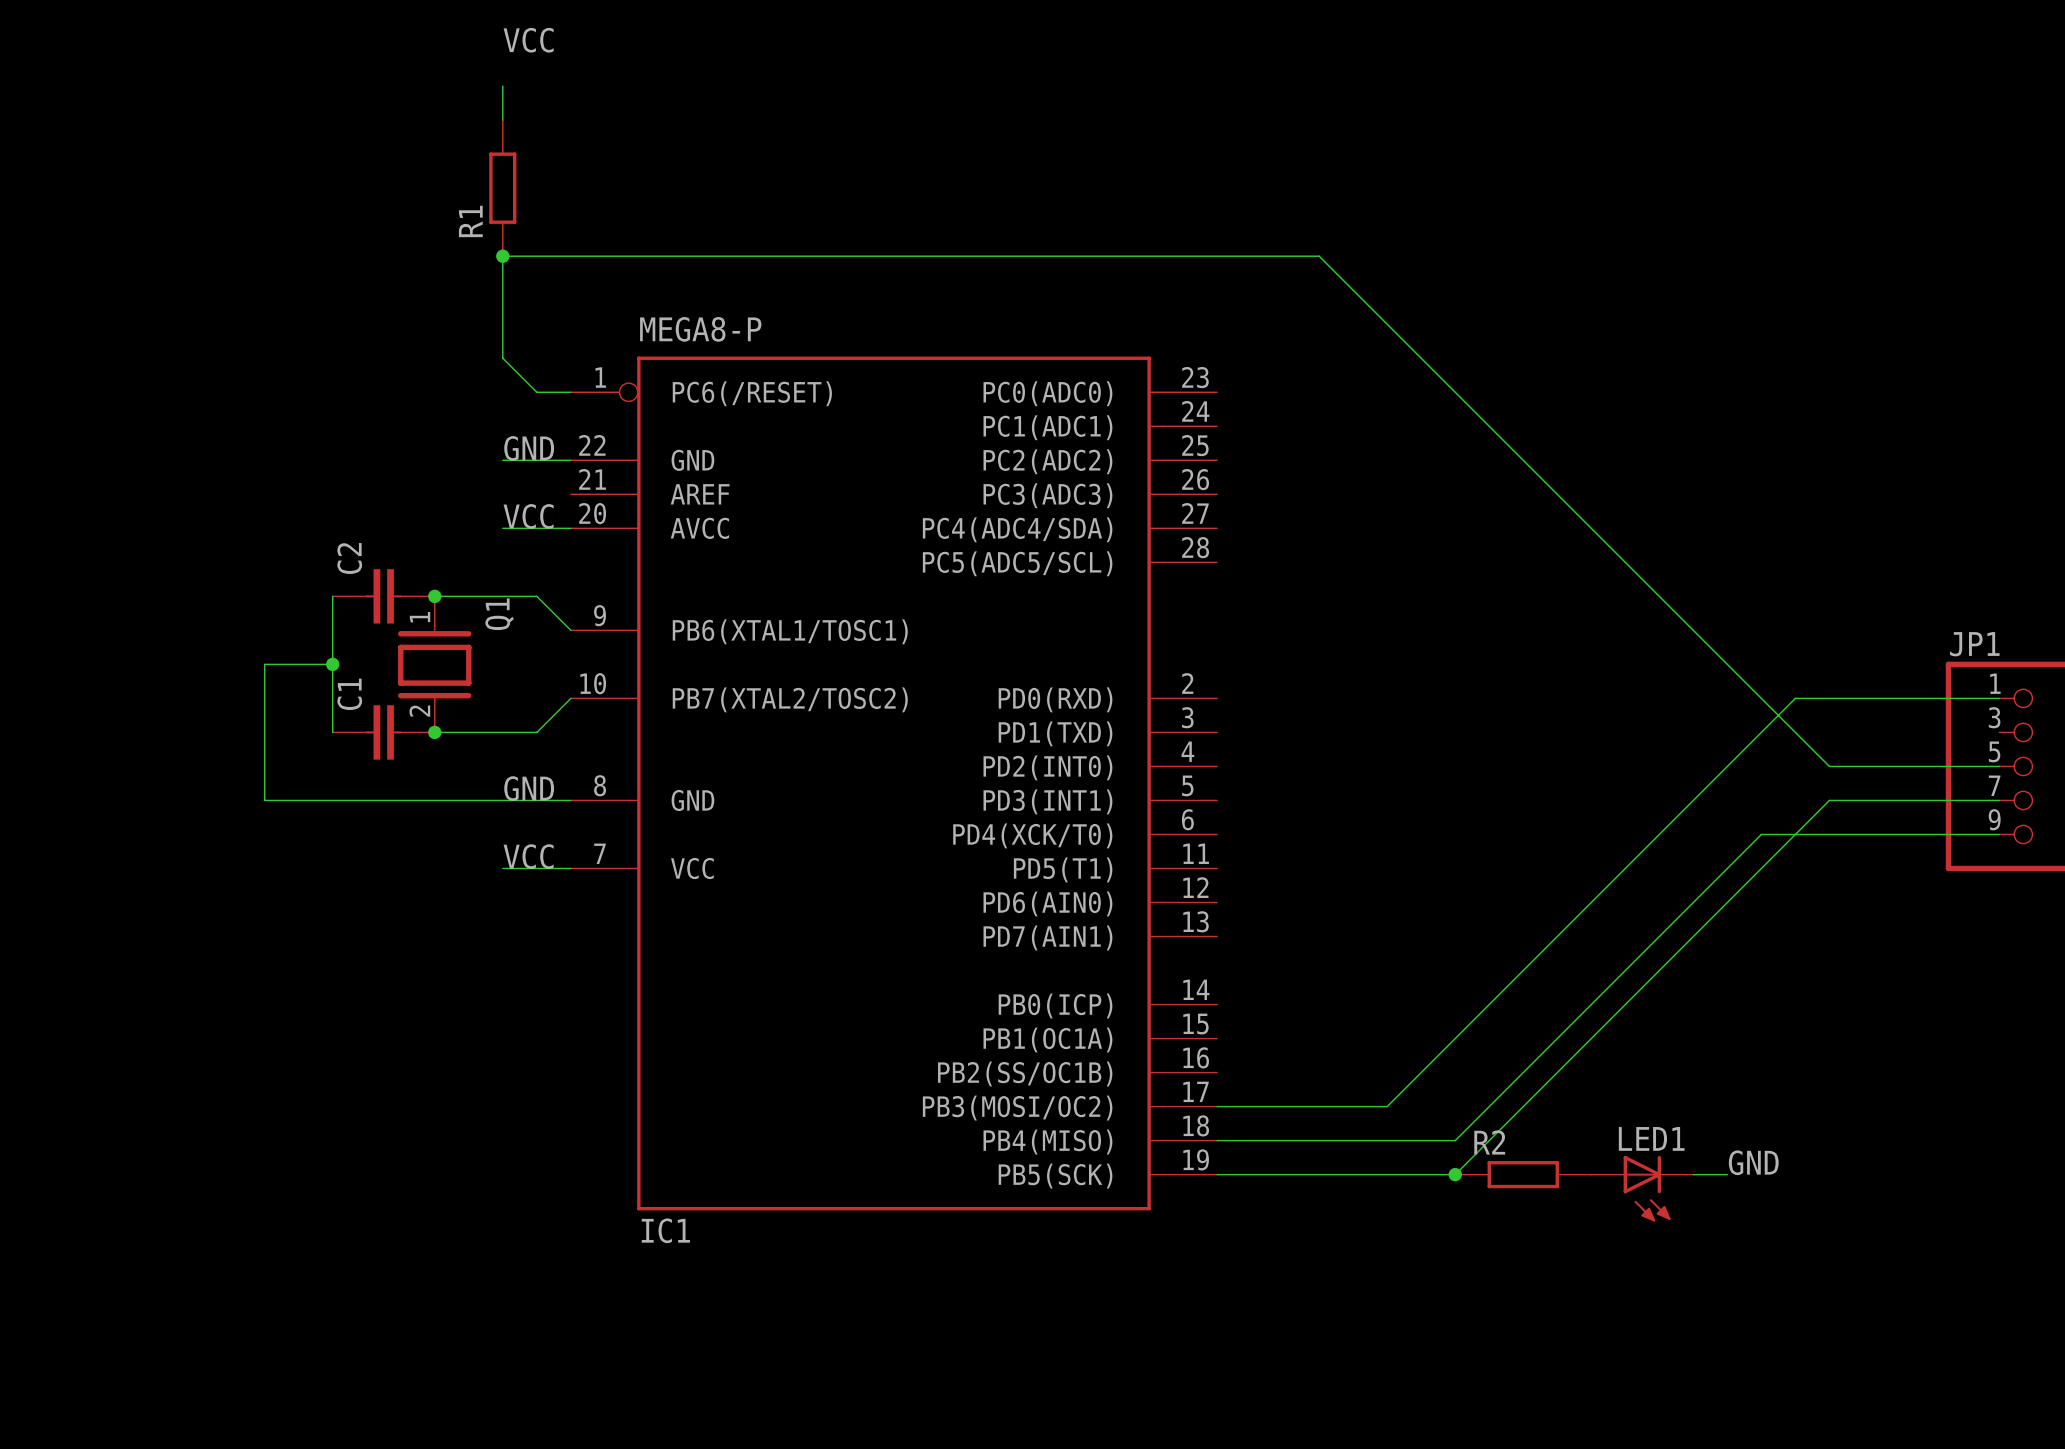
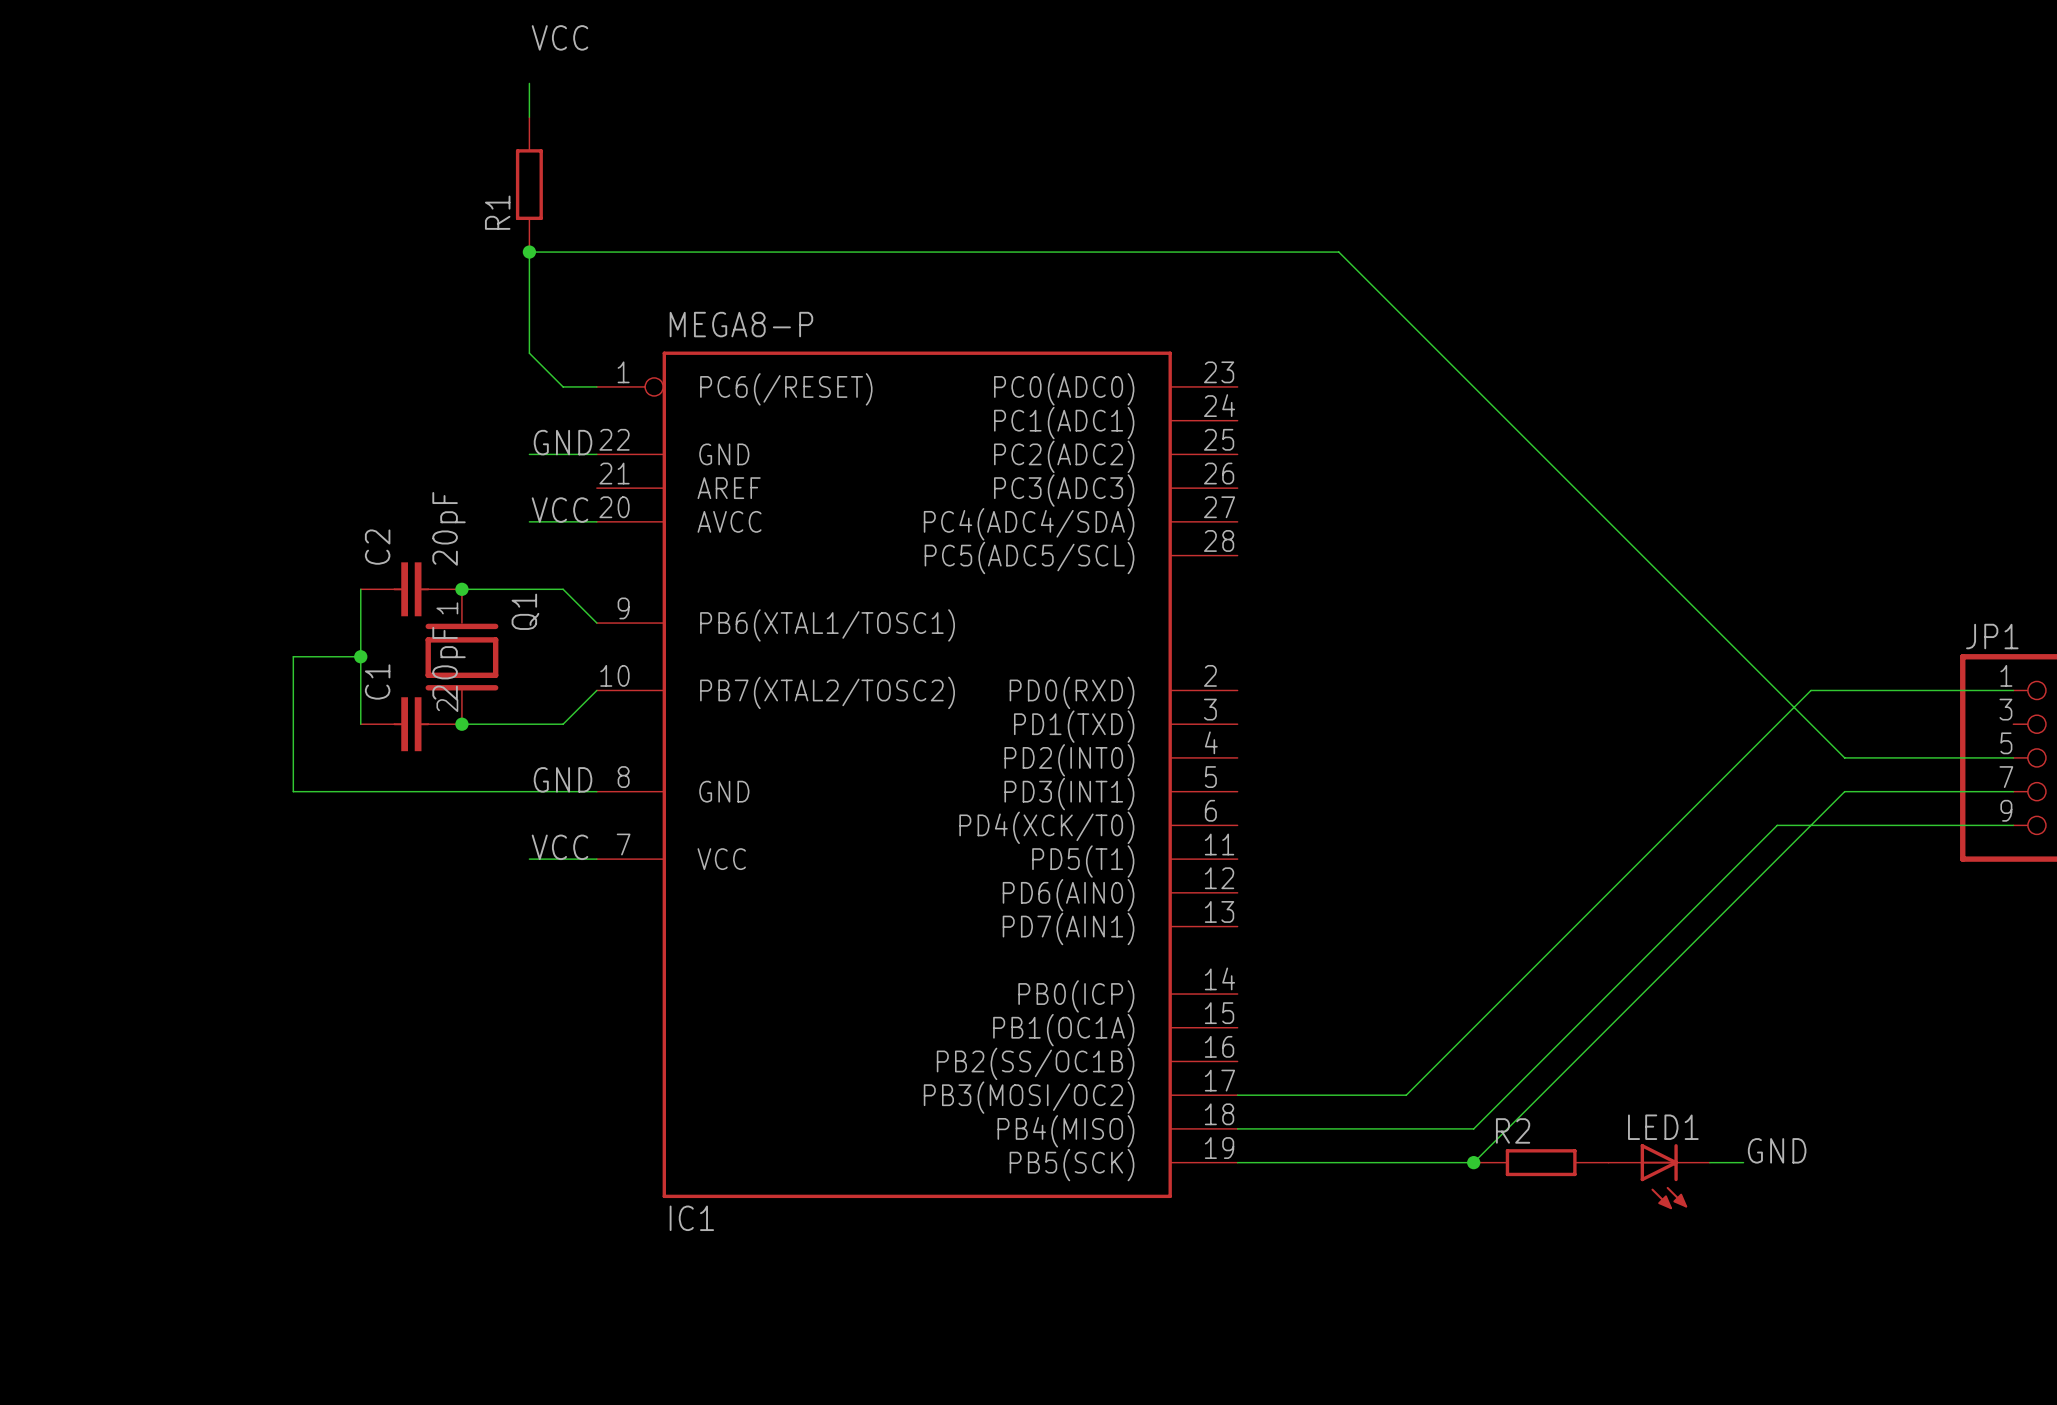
C2 value: none -> 20pF (449, 528)
C1 value: none -> 20pF (449, 663)

